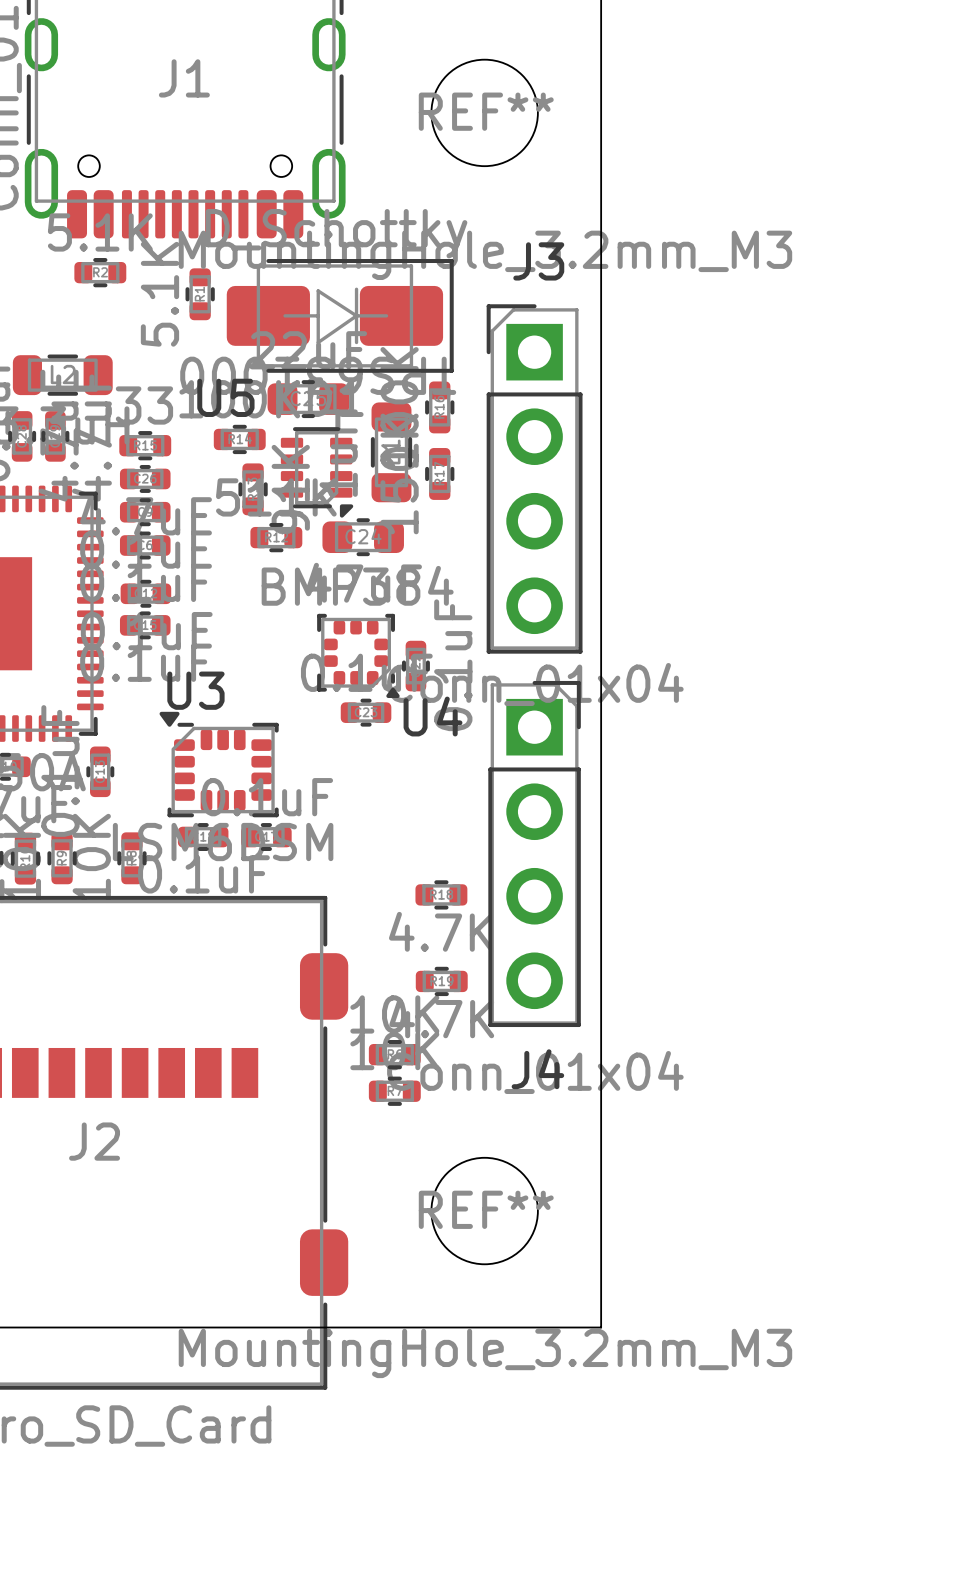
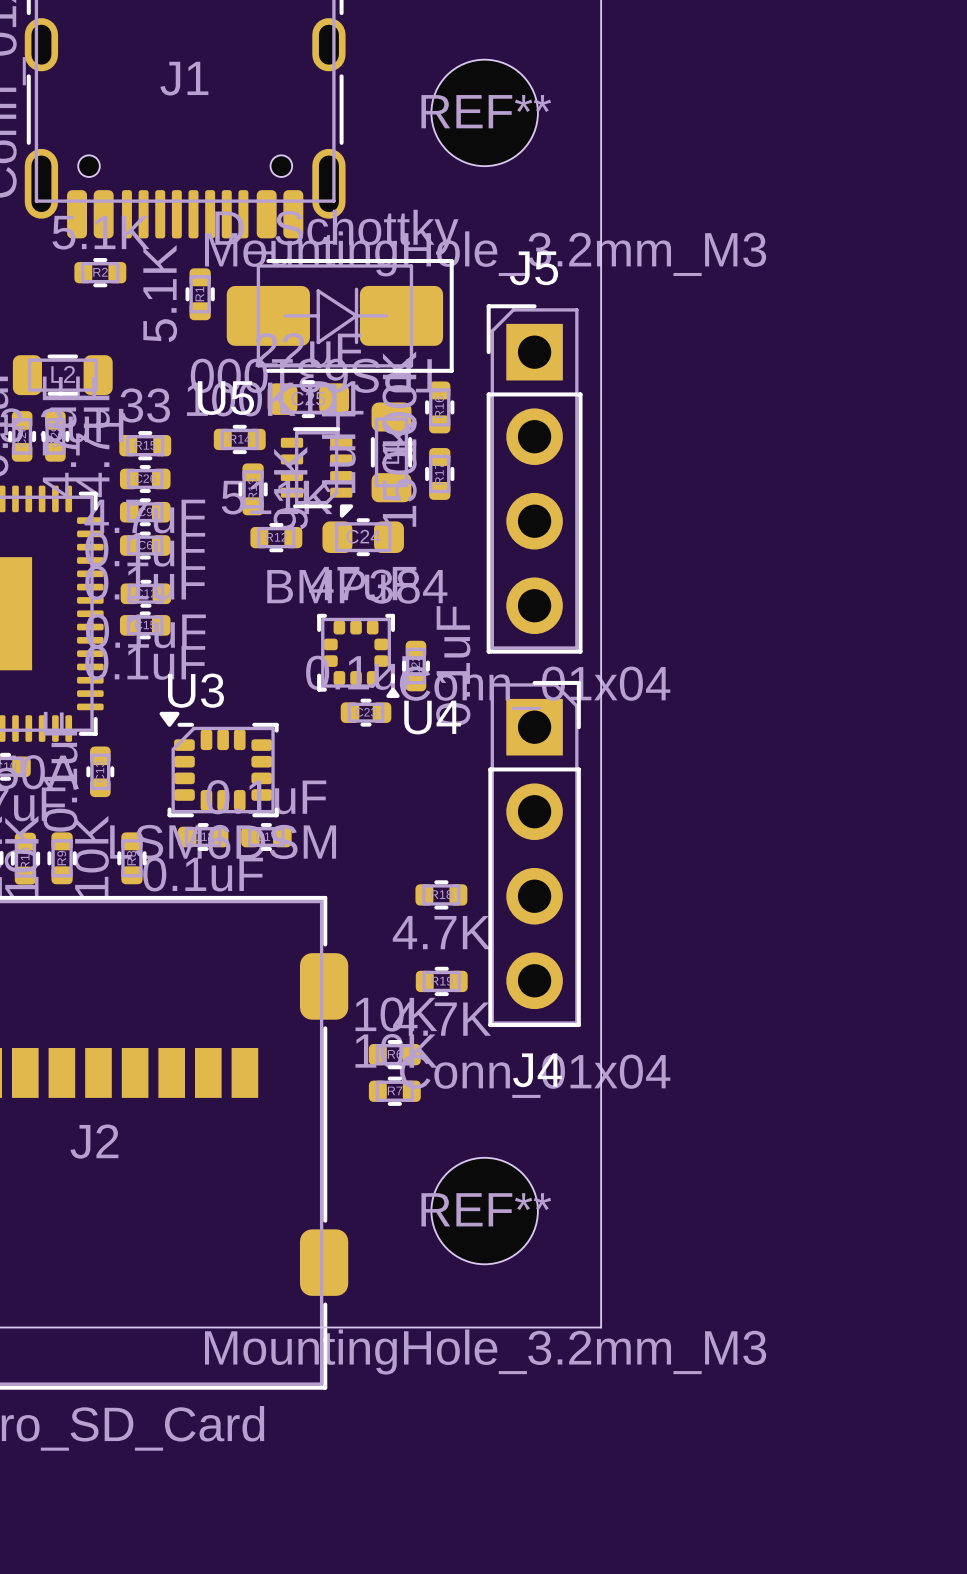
J3 name: J3 (538, 261) -> J5 (533, 268)

